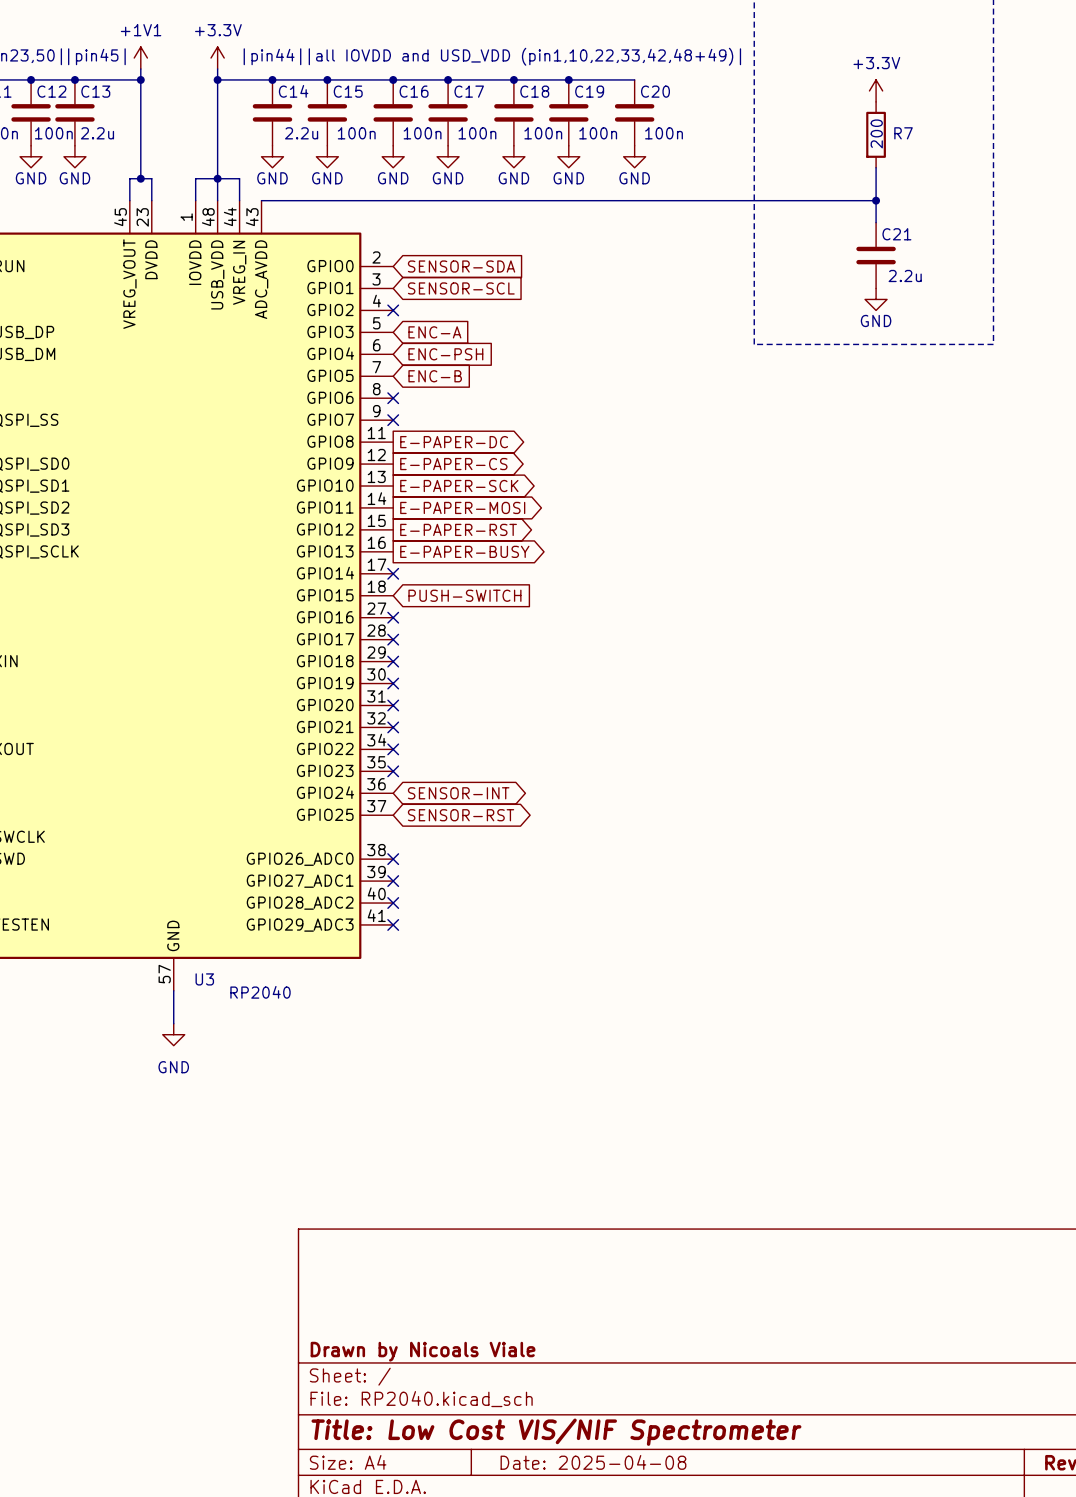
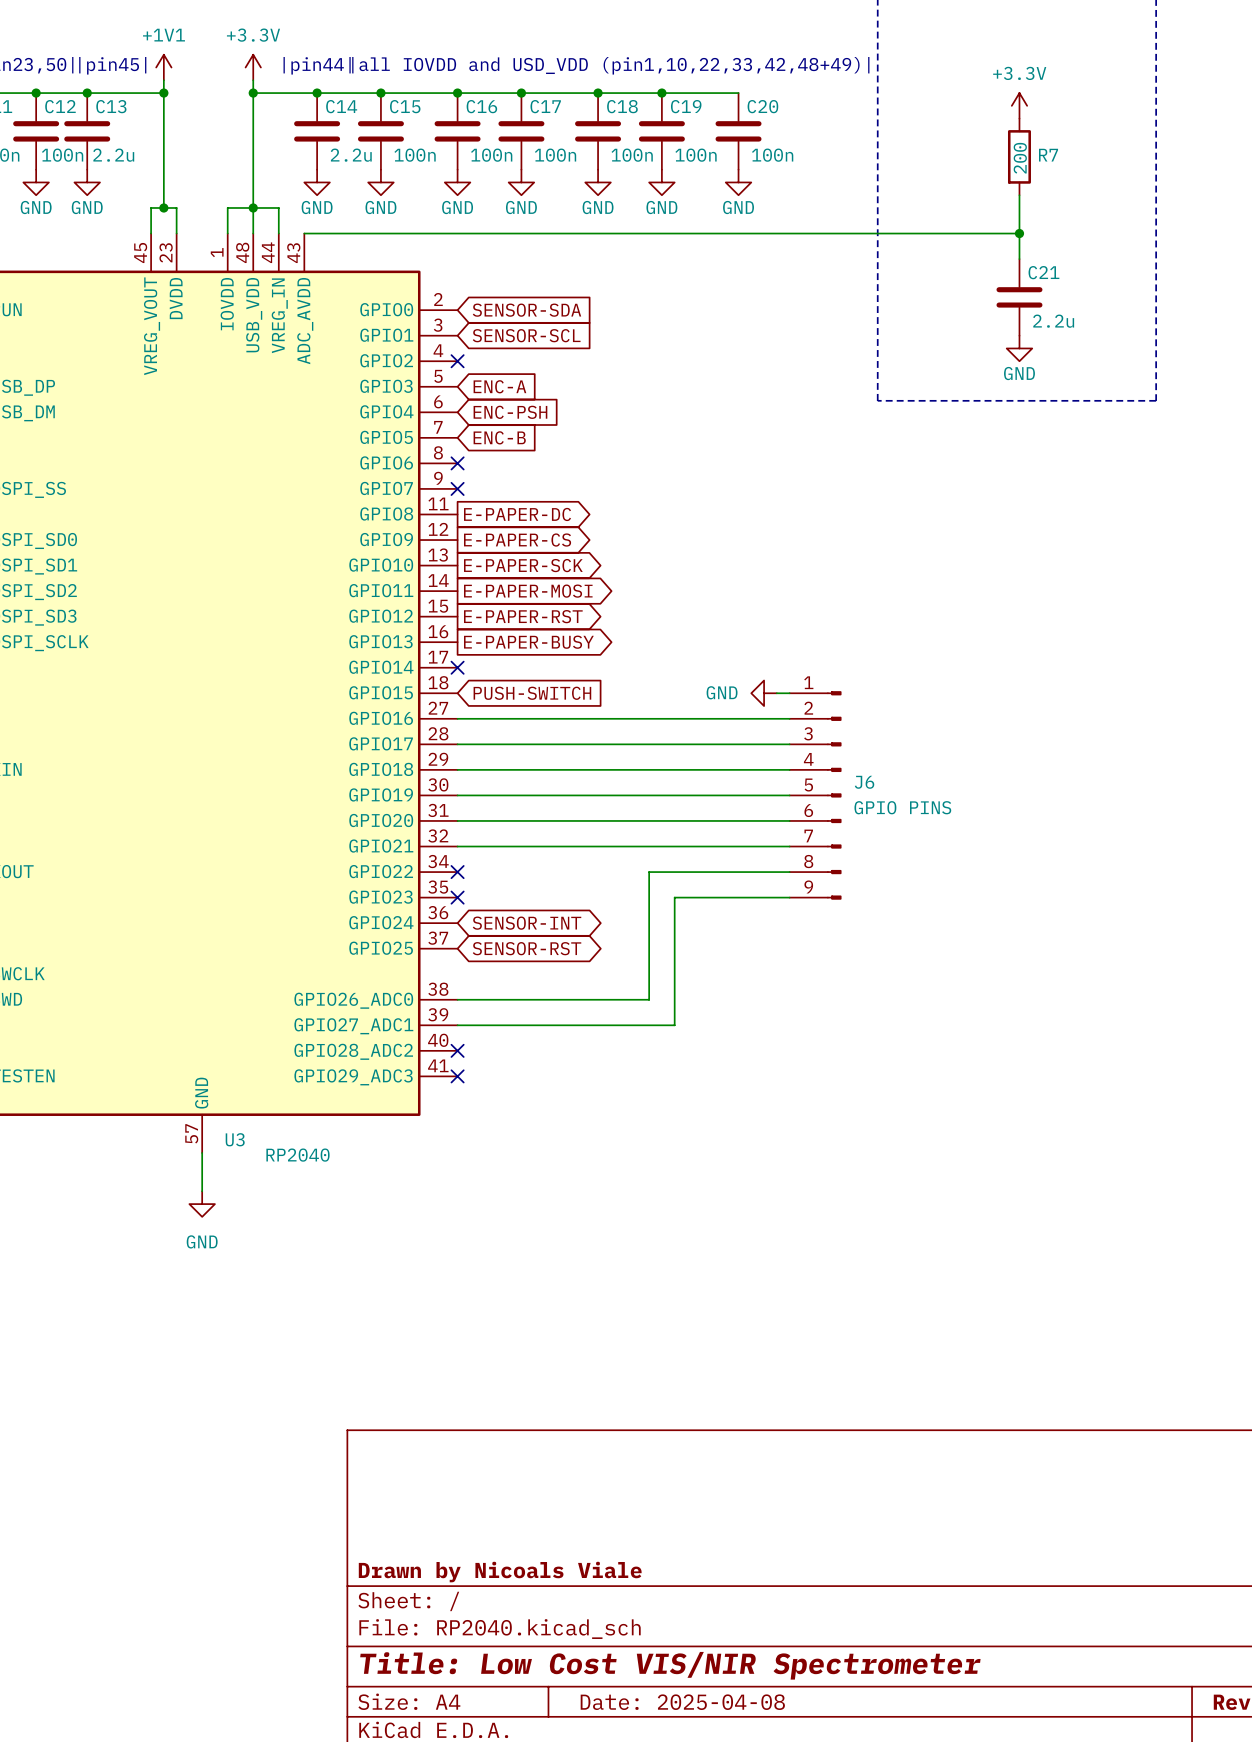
power symbol: none -> GND (764, 693)
wire: none -> (776, 693) (789, 693)
wire: none -> (457, 718) (789, 718)
no-connect mark: (393, 617) -> none
wire: none -> (457, 744) (789, 744)
no-connect mark: (393, 639) -> none
wire: none -> (457, 769) (789, 769)
no-connect mark: (393, 661) -> none
wire: none -> (457, 795) (789, 795)
no-connect mark: (393, 683) -> none
J6: none -> GPIO PINS (815, 795)
wire: none -> (457, 820) (789, 820)
no-connect mark: (393, 705) -> none
wire: none -> (457, 846) (789, 846)
no-connect mark: (393, 727) -> none
wire: none -> (789, 872) (649, 872) (649, 999) (457, 999)
wire: none -> (789, 897) (674, 897) (674, 1025) (457, 1025)
no-connect mark: (393, 859) -> none
no-connect mark: (393, 881) -> none
title block: Title: Low Cost VIS/NIF Spectrometer (556, 1432) -> Title: Low Cost VIS/NIR Spectrometer (670, 1665)

